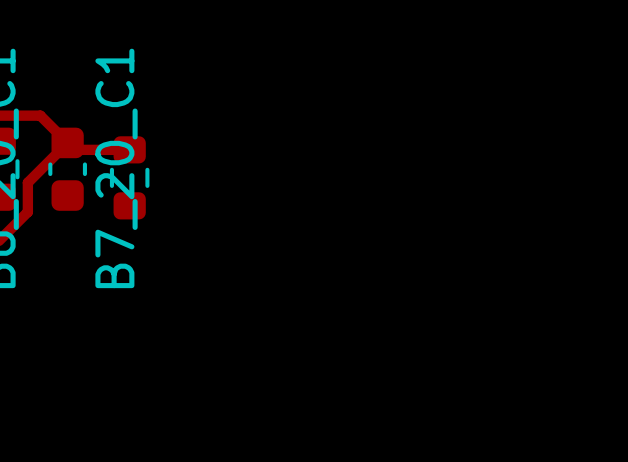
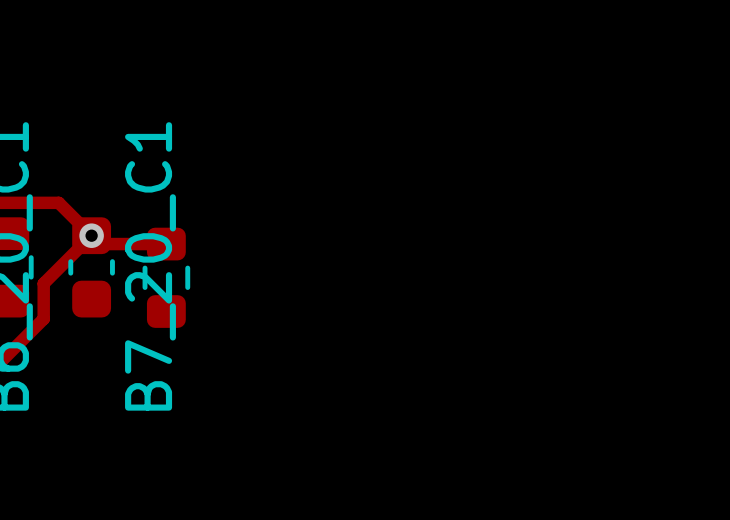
via: none -> (91, 235)

